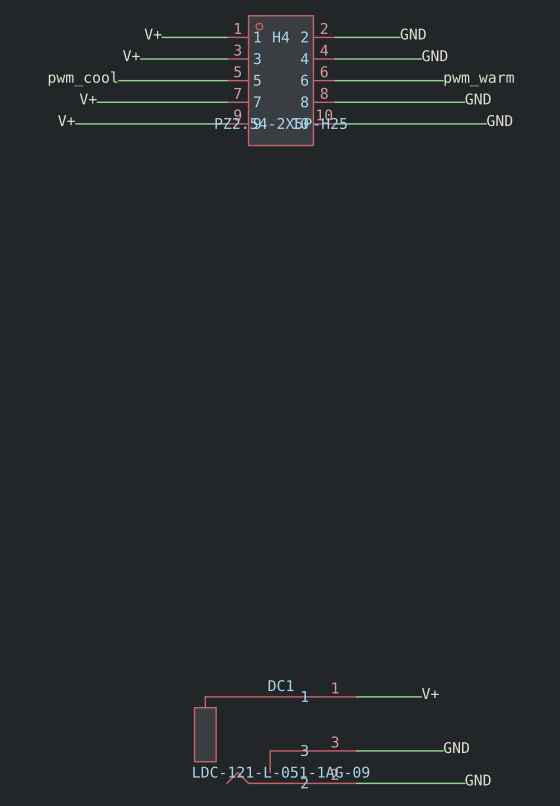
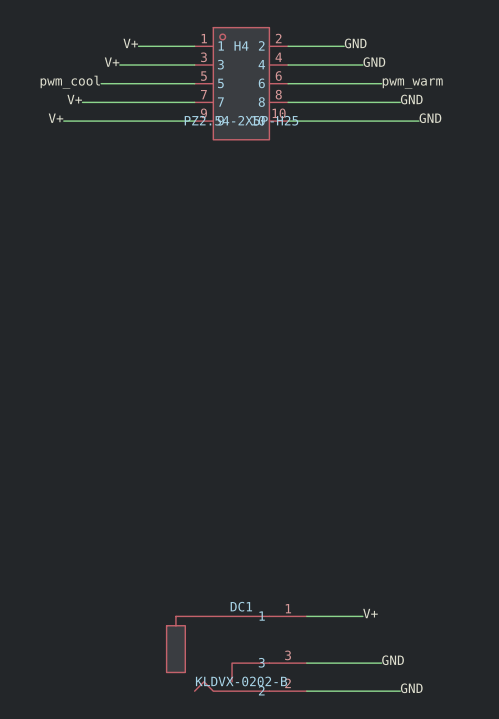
DC1 value: LDC-121-L-051-1AG-09 (281, 772) -> KLDVX-0202-B (241, 681)

